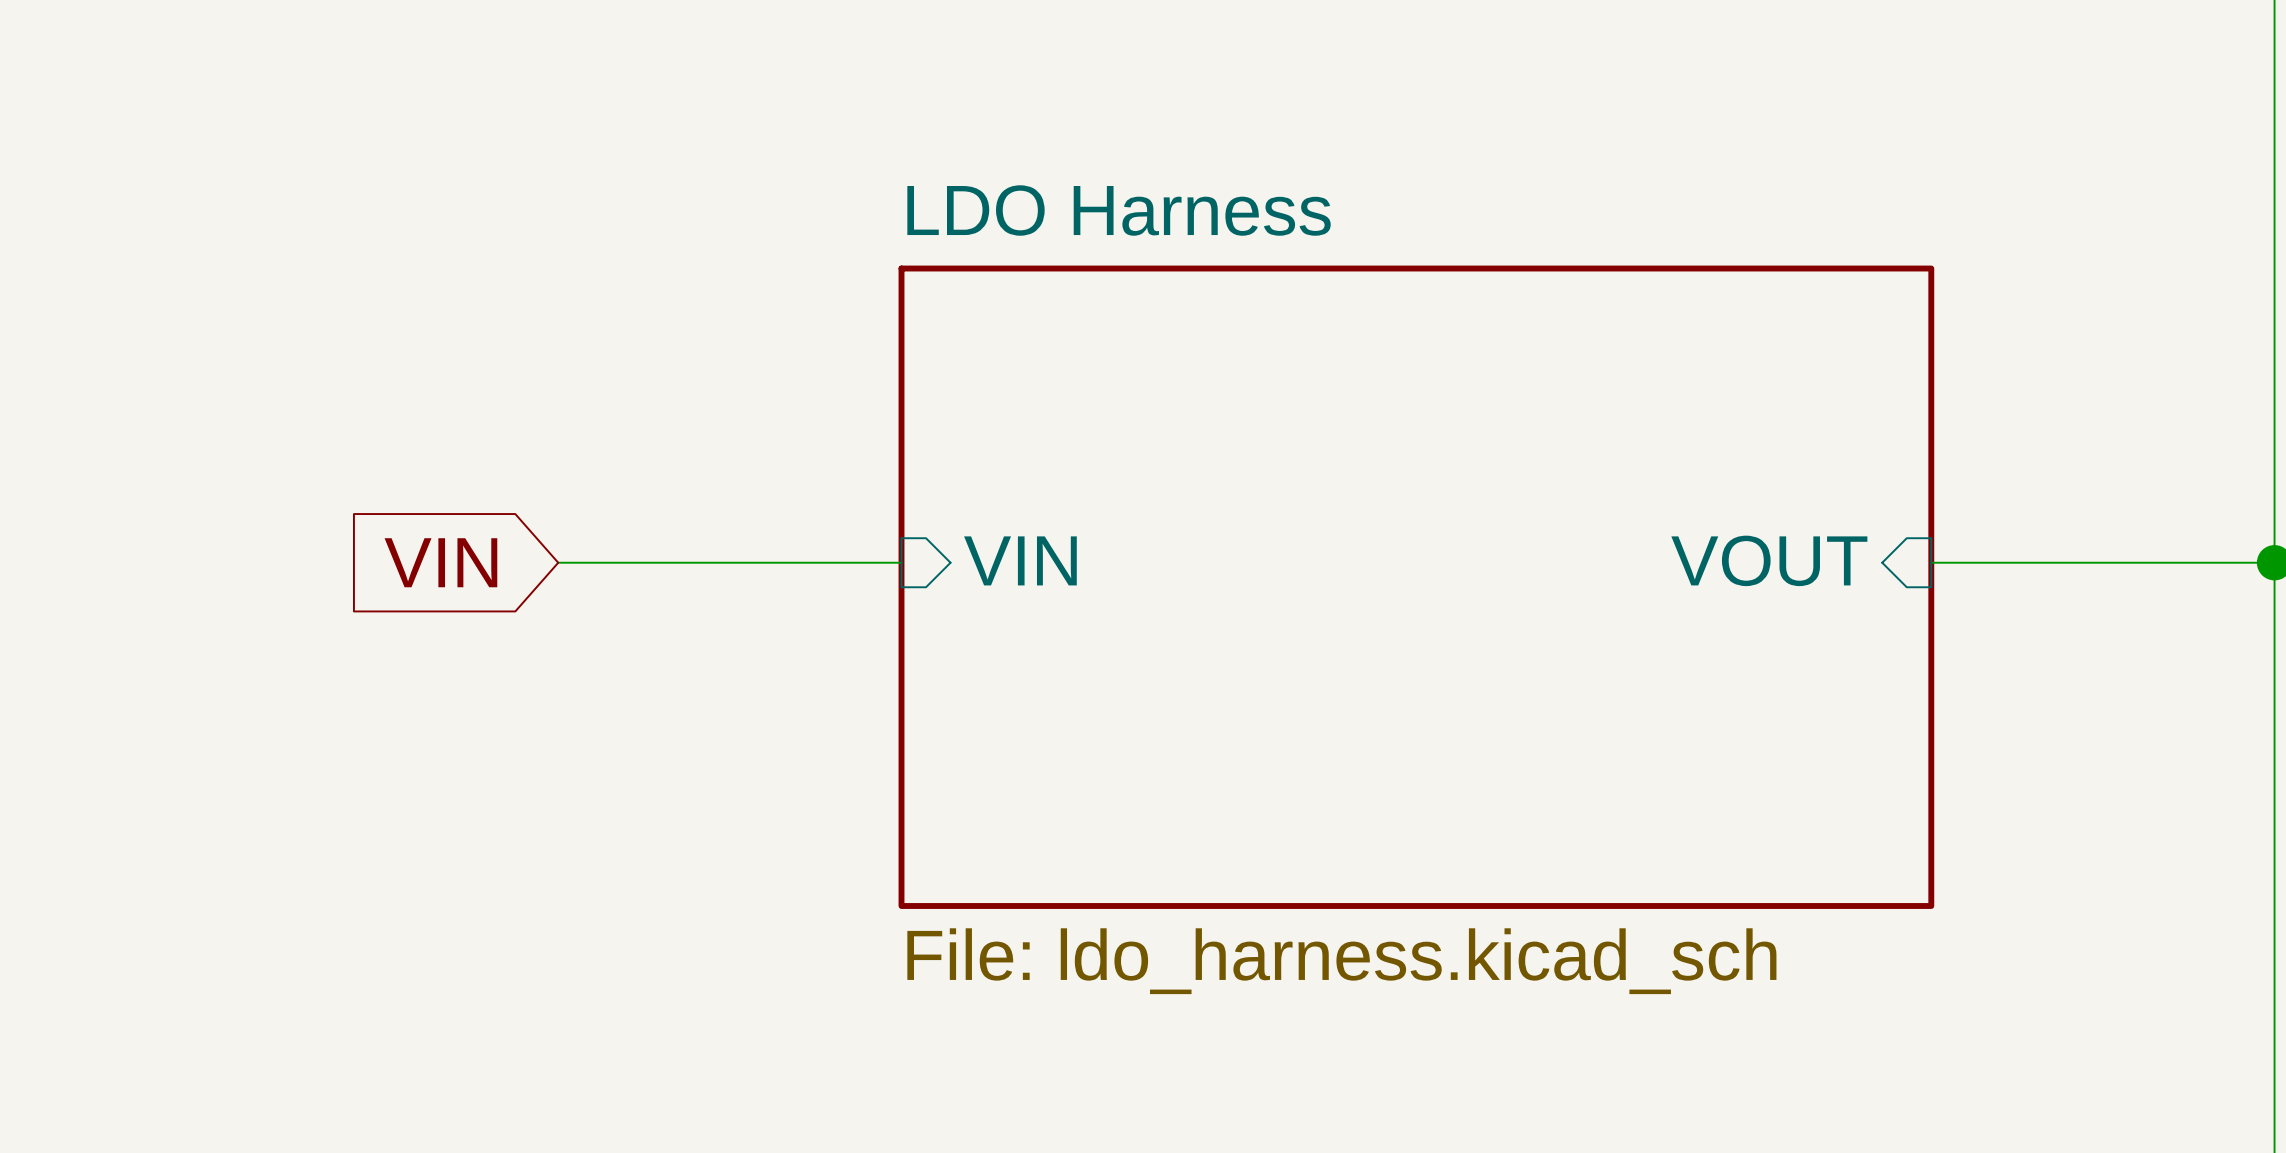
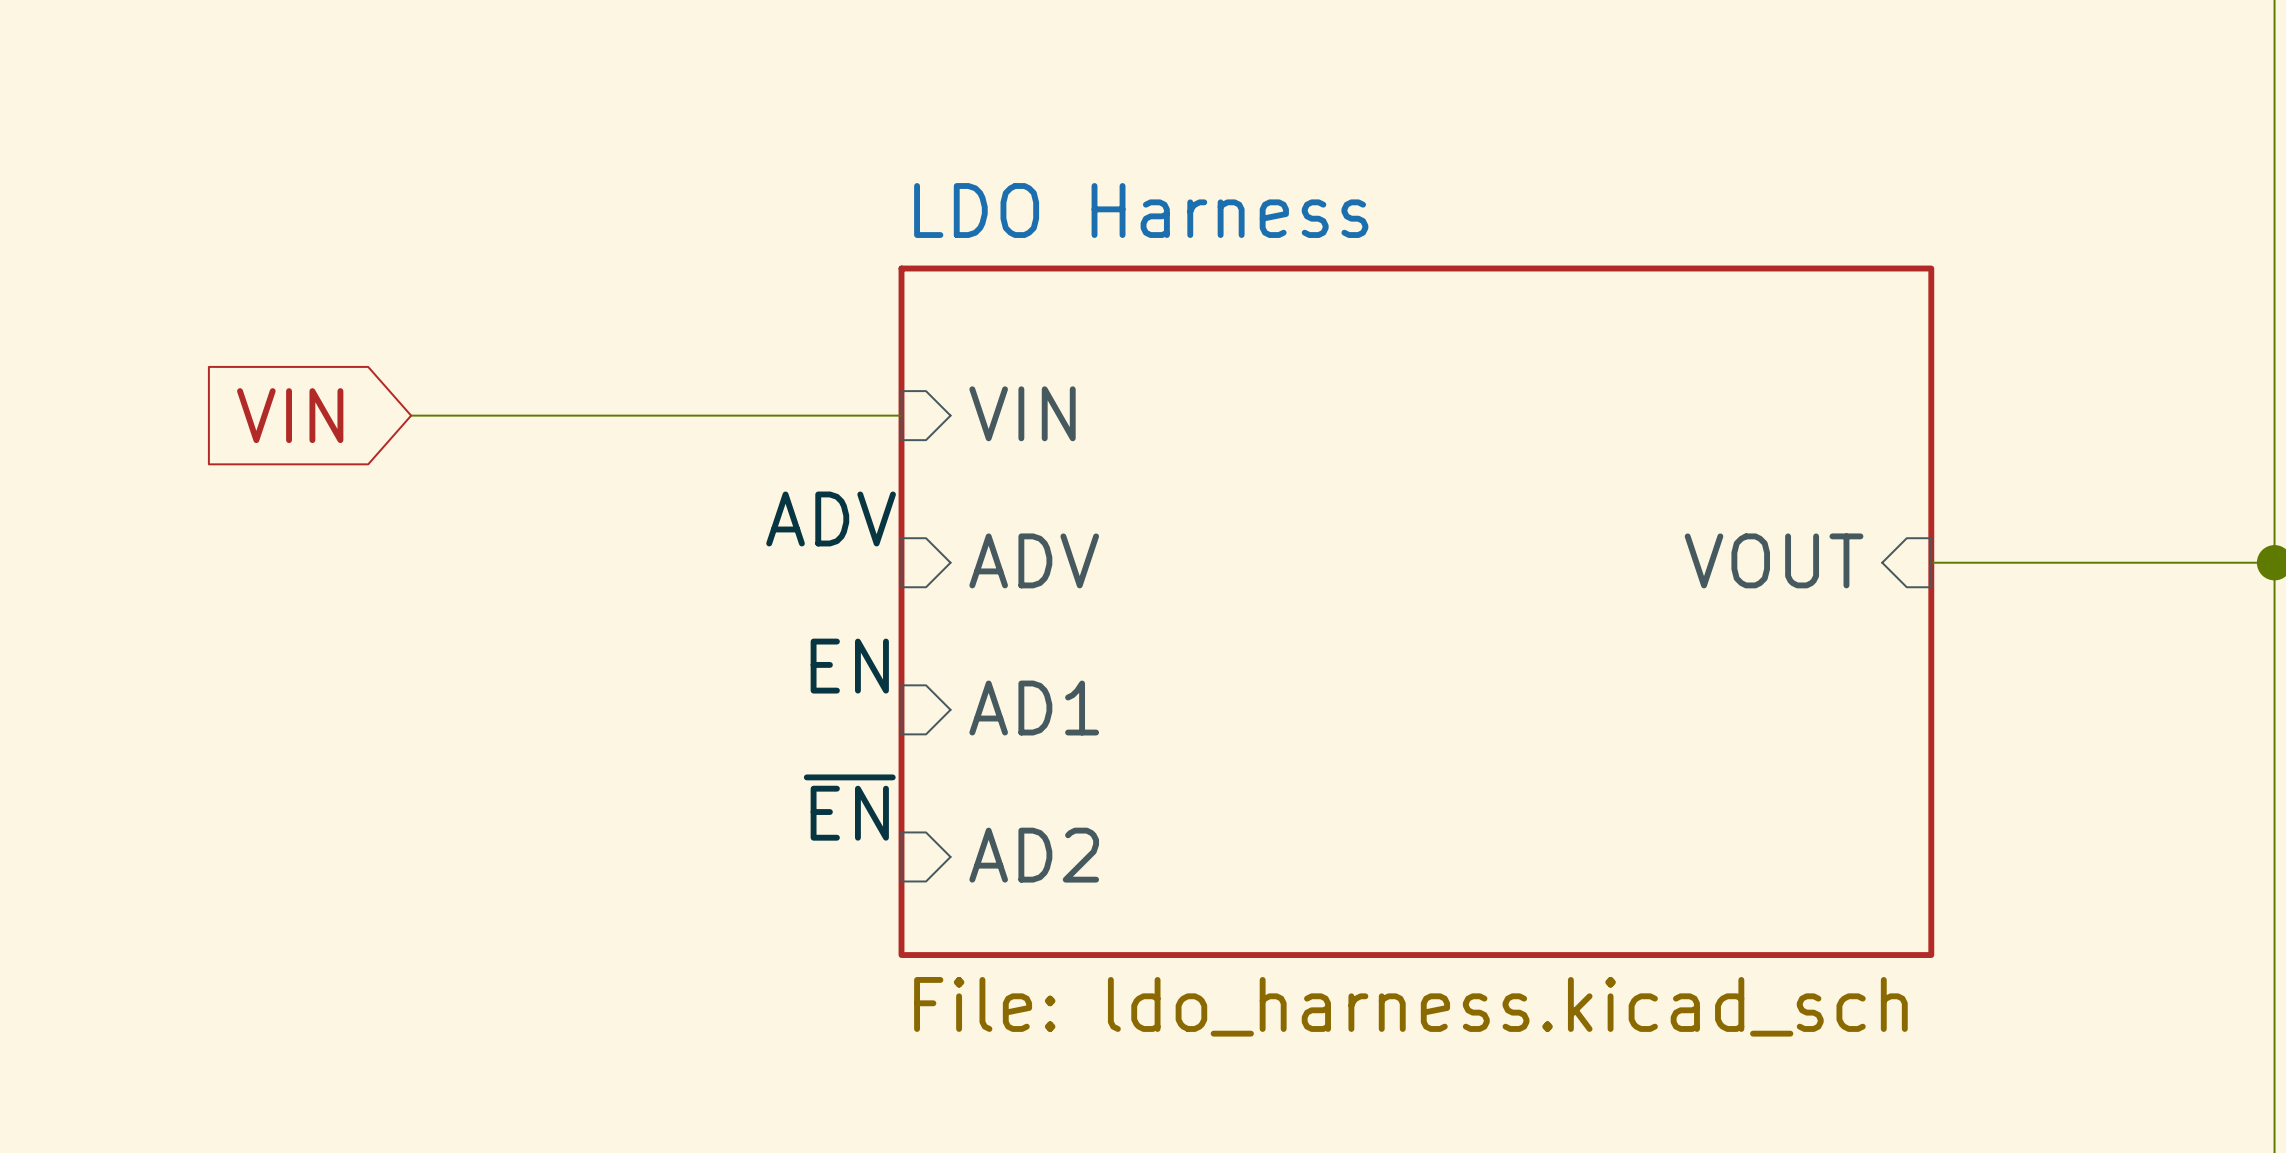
sheet LDO Harness shape: [898, 265, 1935, 909] -> [898, 265, 1935, 958]
sheet pin: none -> VIN (1022, 413)
wire: none -> (411, 415) (901, 415)
label: none -> ADV (831, 518)
sheet pin: VIN (1020, 560) -> ADV (1034, 560)
global label position: VIN (440, 562) -> VIN (290, 415)
wire: (558, 562) (901, 562) -> none
label: none -> EN (849, 666)
sheet pin: none -> AD1 (1034, 708)
label: none -> ~{EN} (849, 807)
sheet pin: none -> AD2 (1034, 855)

